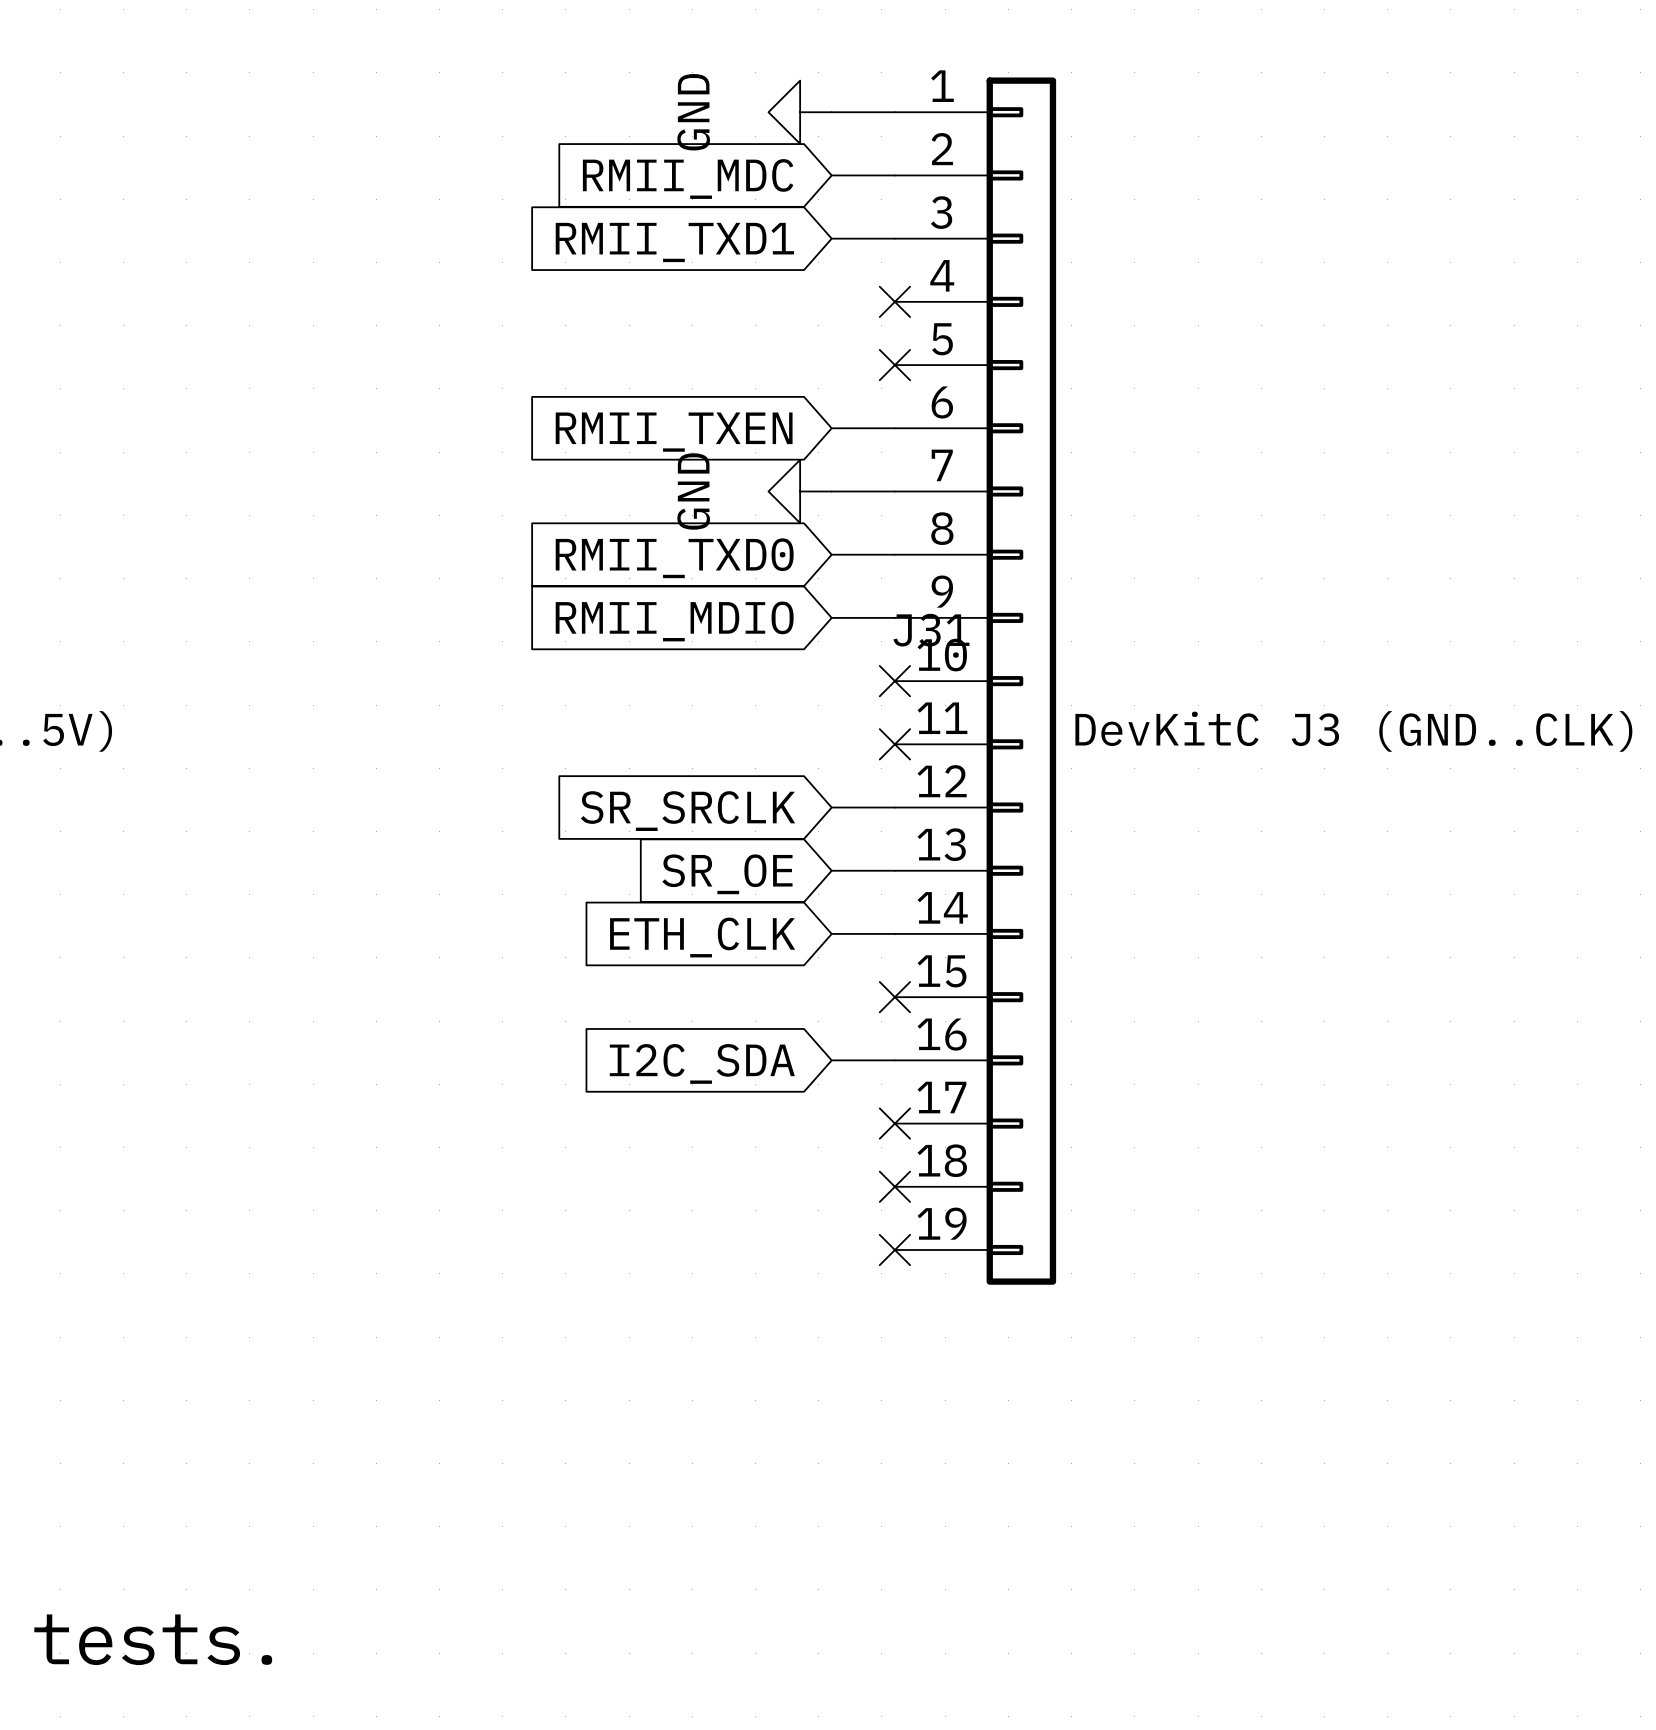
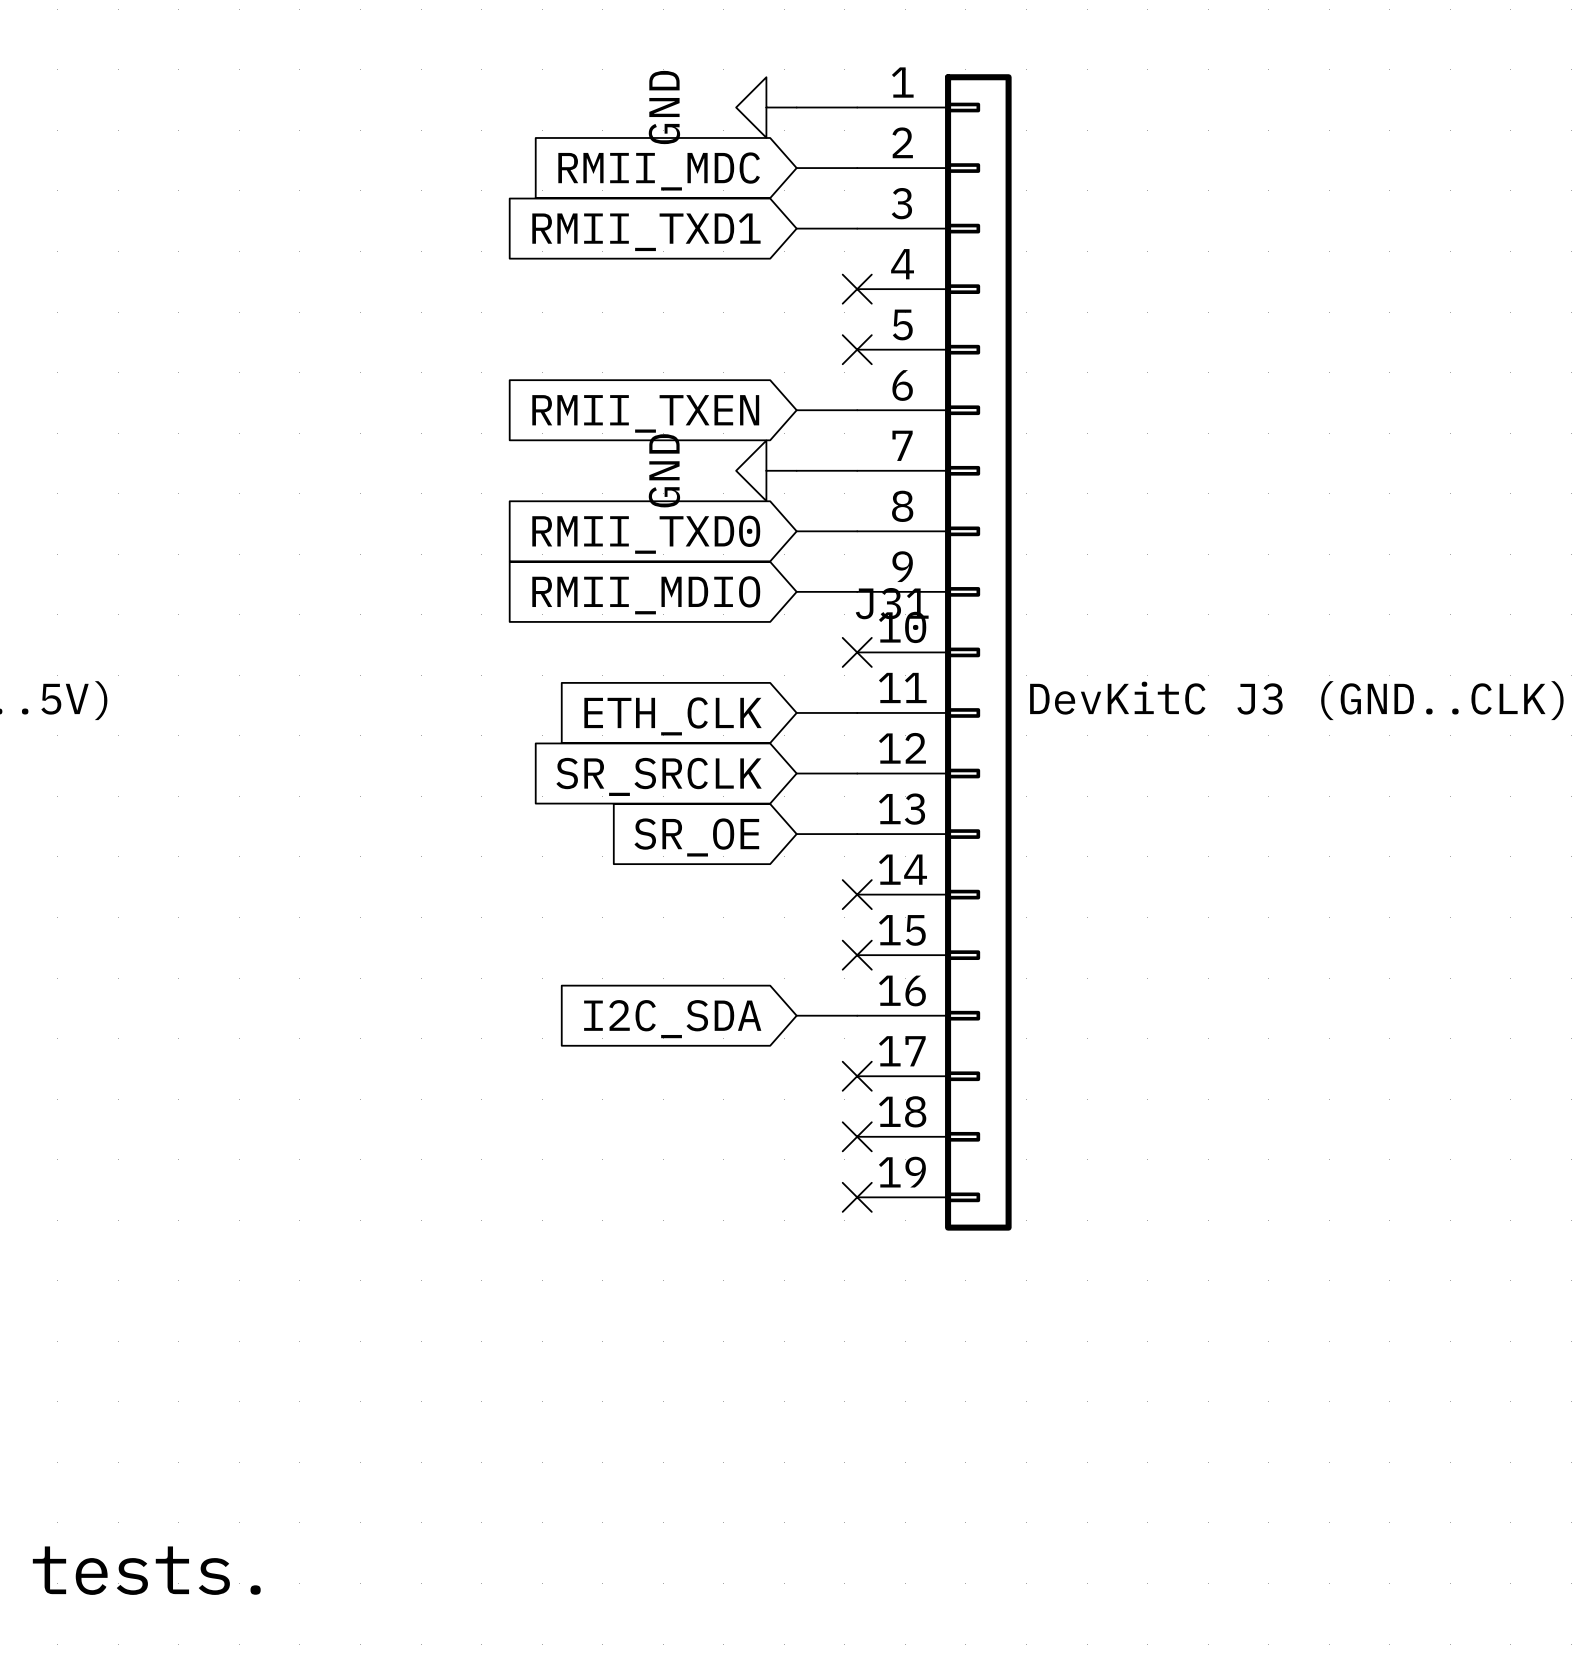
no-connect mark: (894, 744) -> none
wire: (831, 933) (894, 933) -> (796, 712) (857, 712)
no-connect mark: none -> (857, 894)
global label position: ETH_CLK (702, 937) -> ETH_CLK (673, 716)

